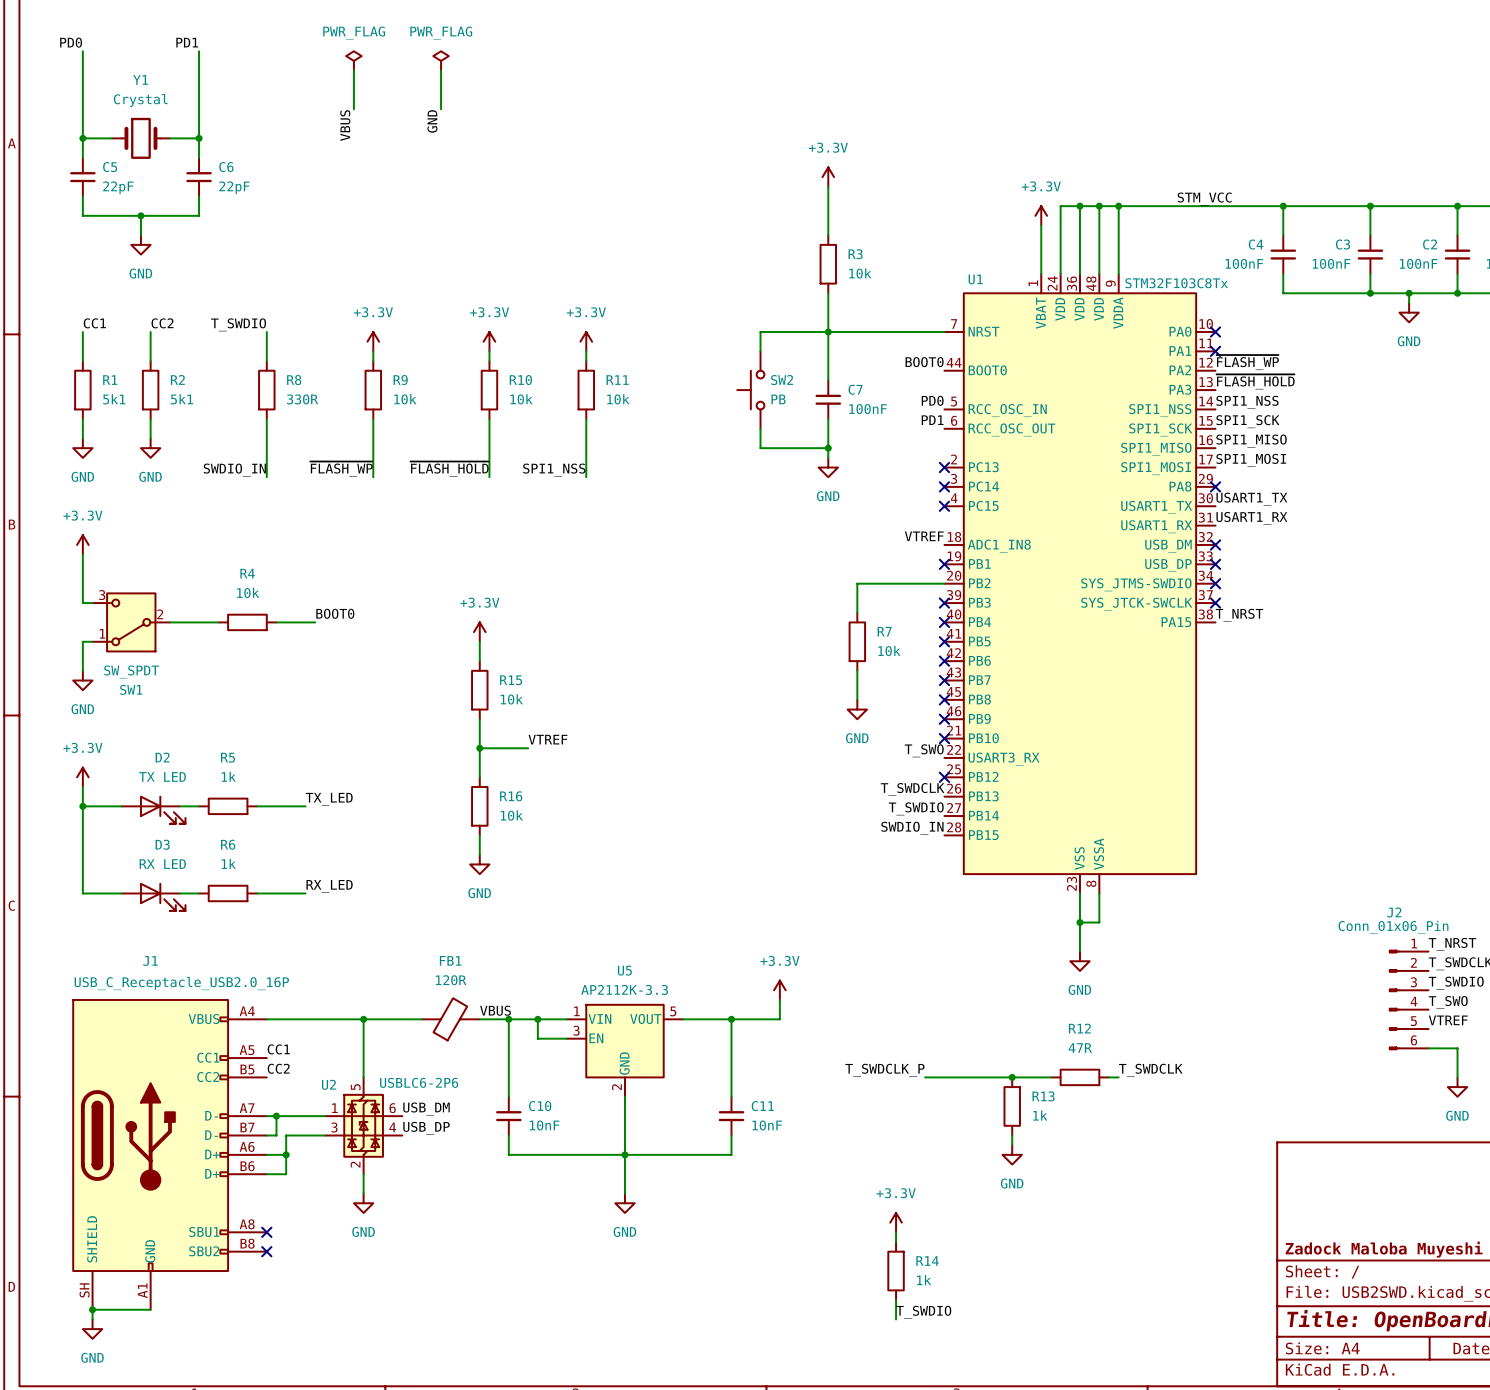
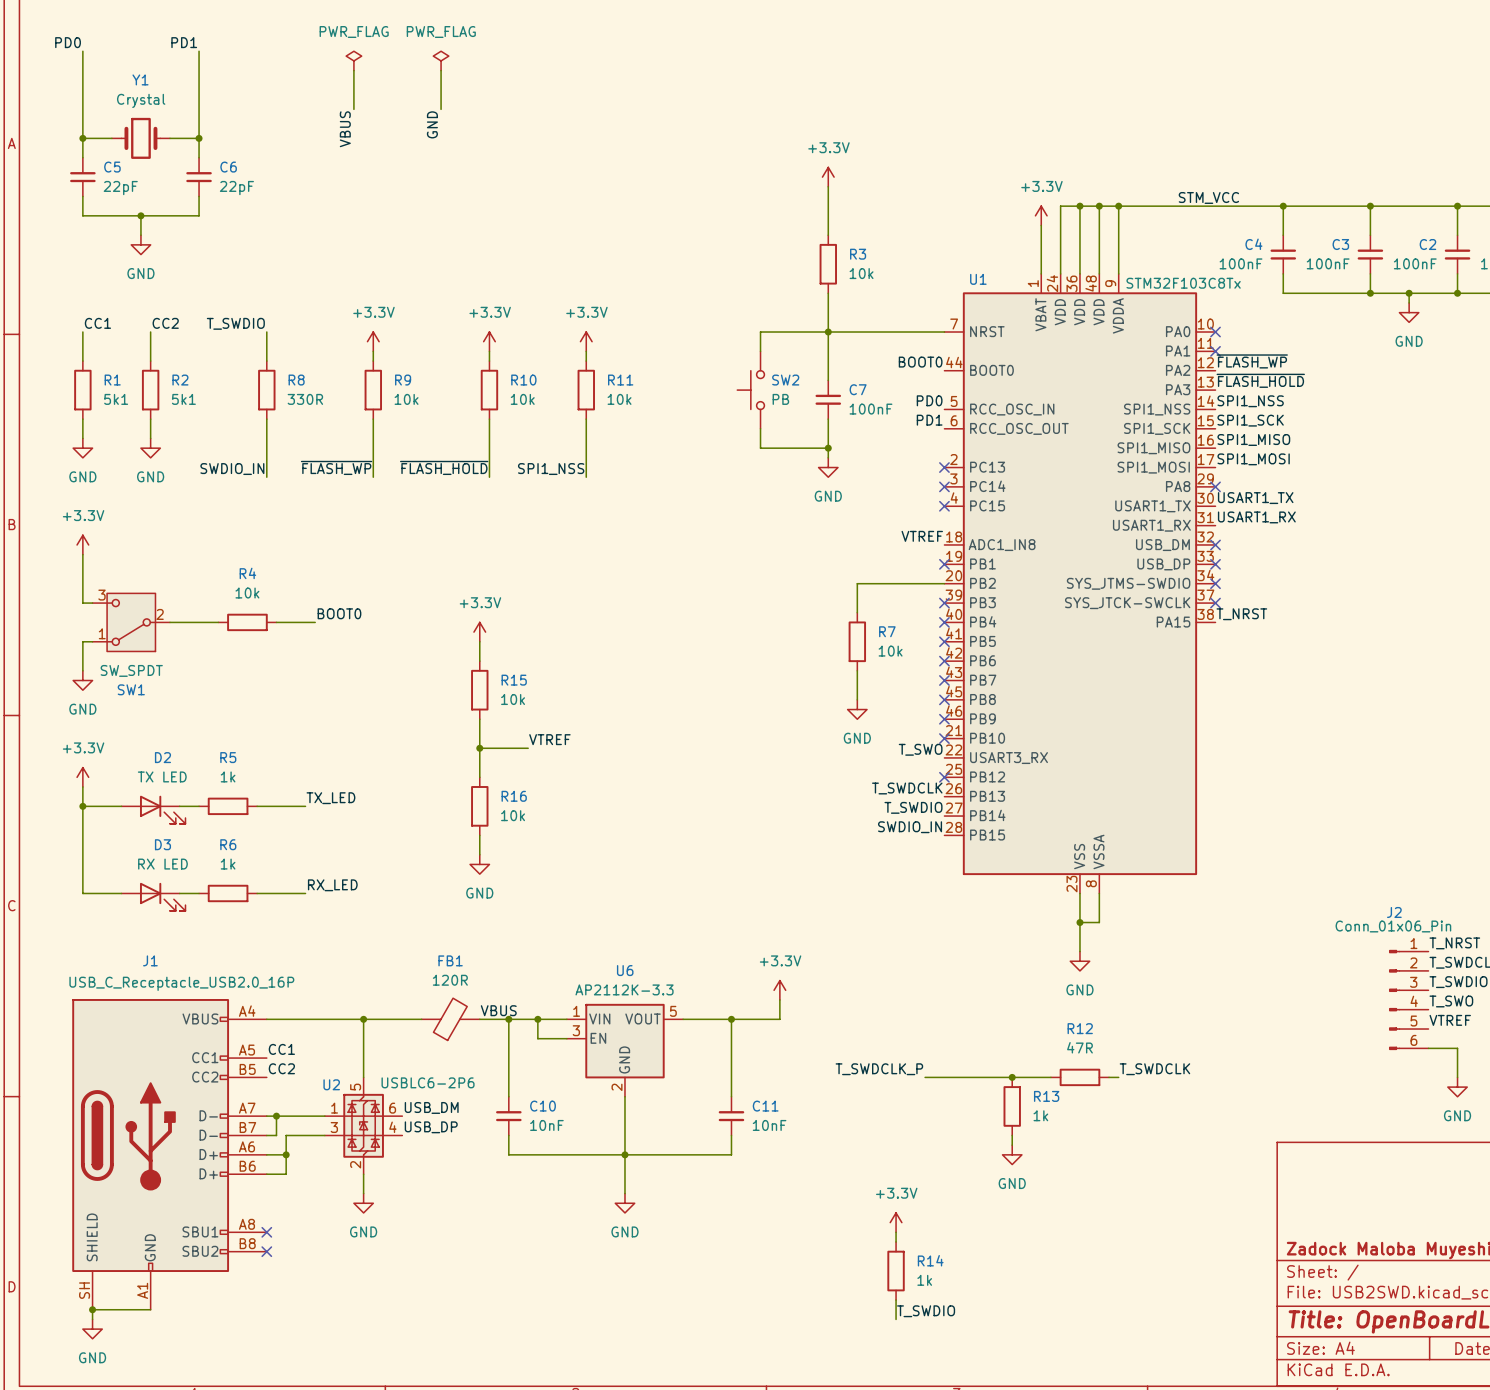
U5 name: U5 (624, 970) -> U6 (625, 970)

